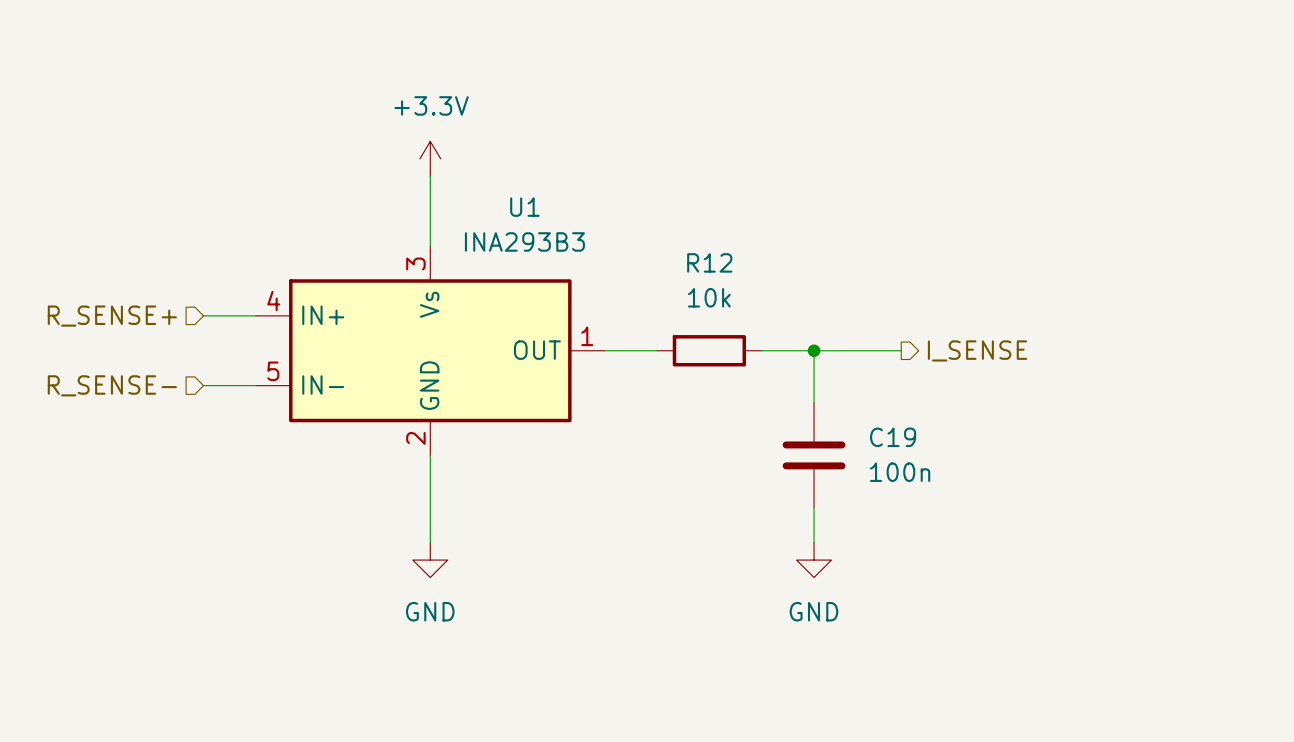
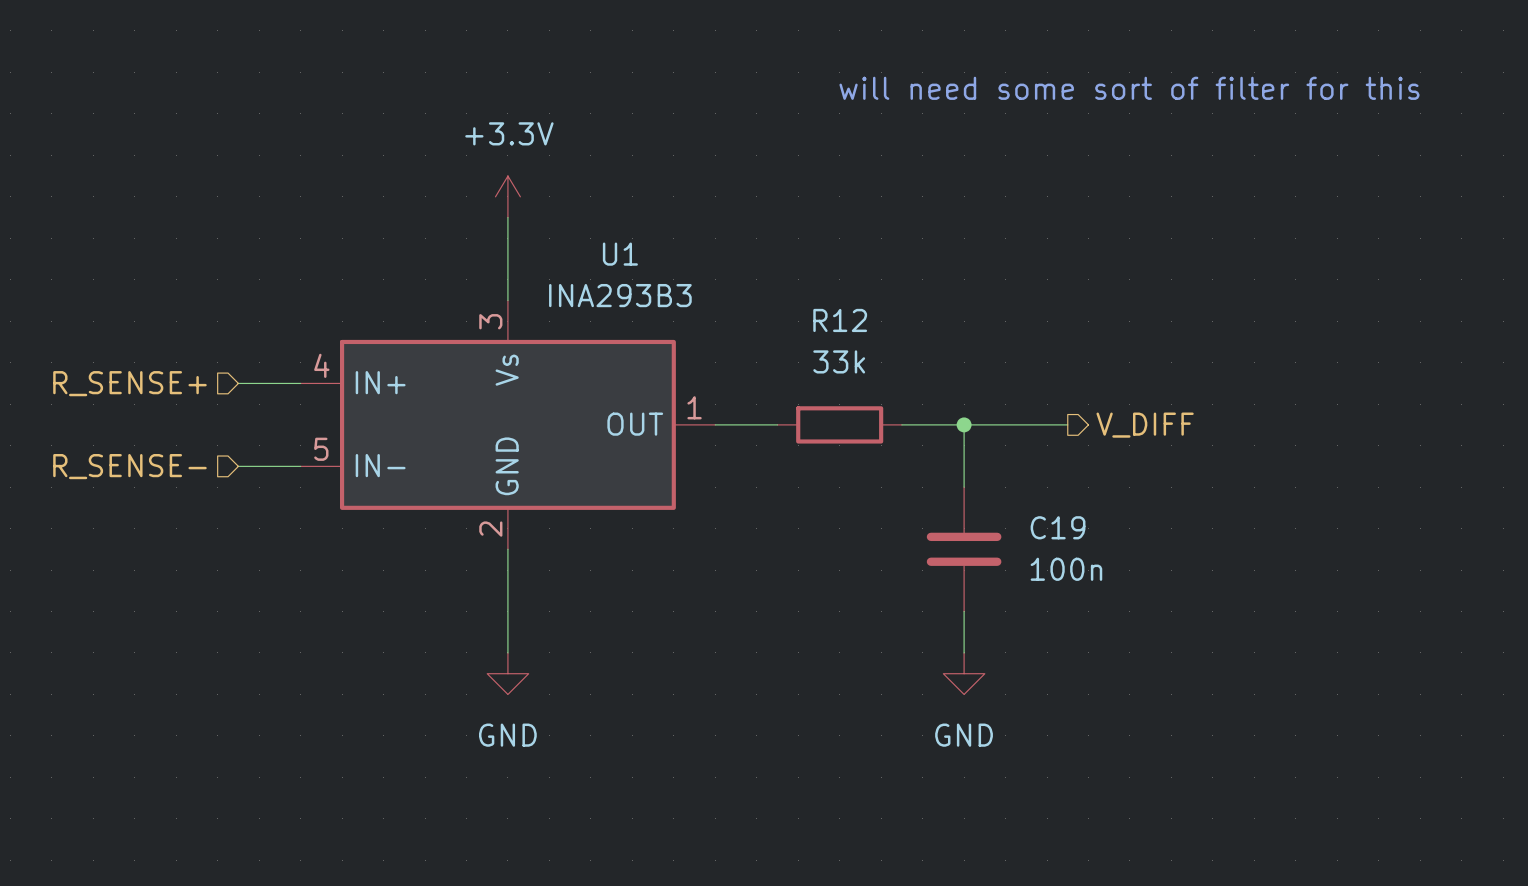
text: none -> will need some sort of filter for this (1129, 88)
R12 value: 10k (709, 297) -> 33k (839, 361)
hierarchical label: I_SENSE (977, 350) -> V_DIFF (1145, 425)

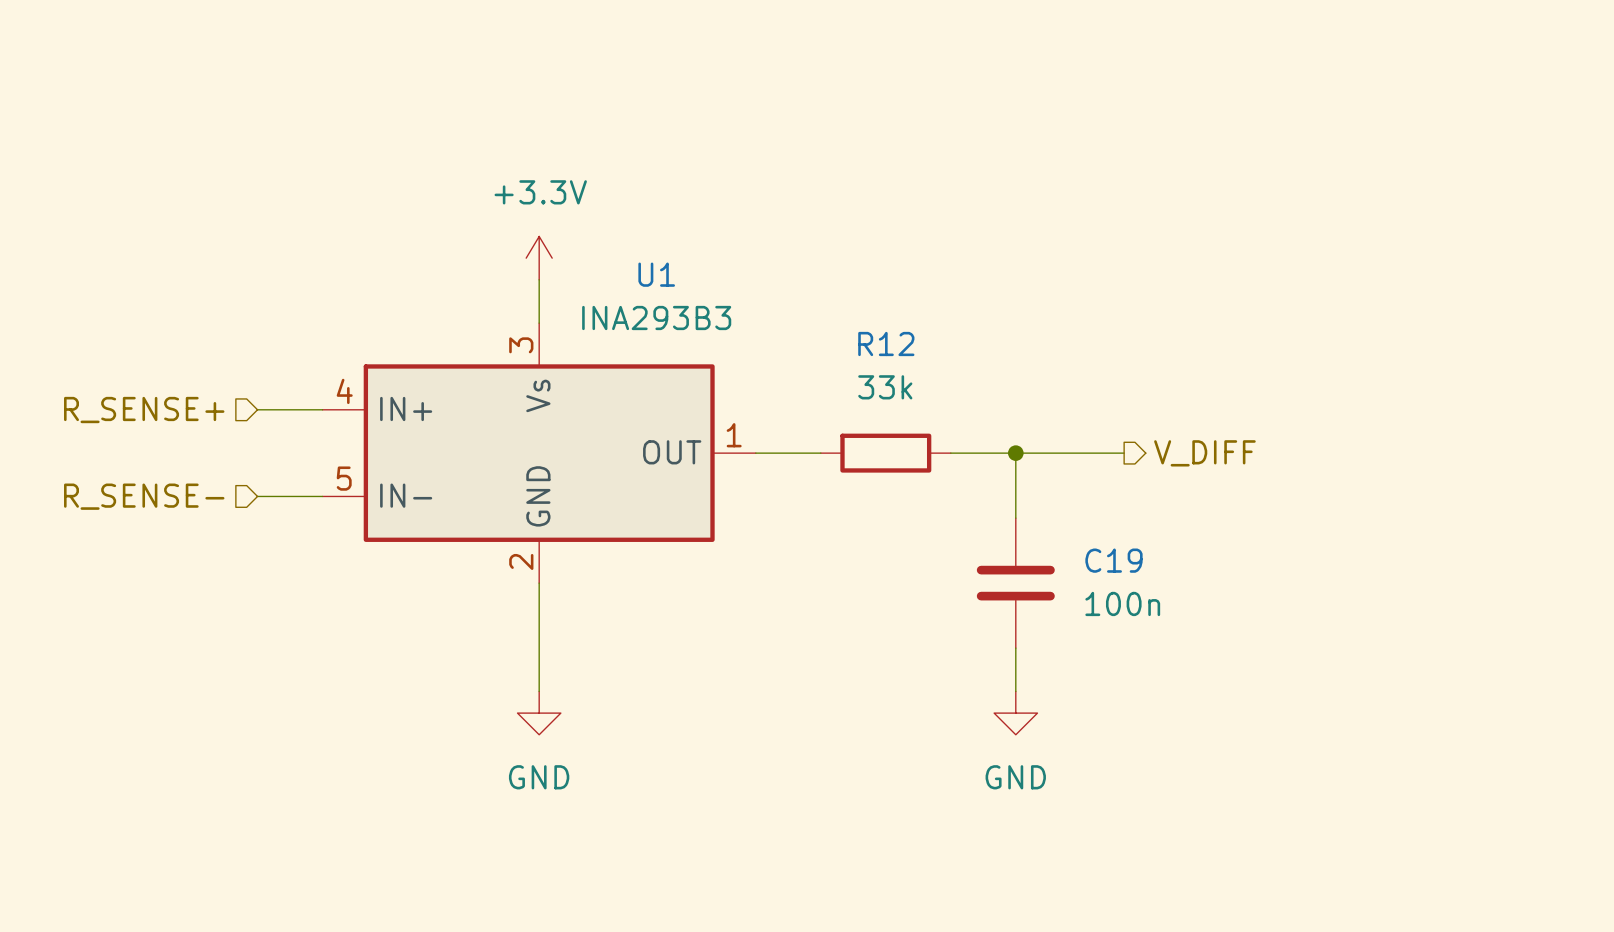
text: will need some sort of filter for this (1129, 88) -> none
power symbol position: +3.3V (507, 196) -> +3.3V (539, 258)

